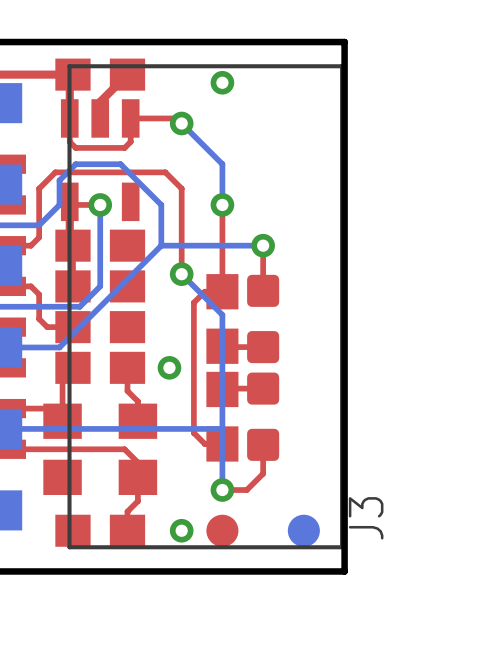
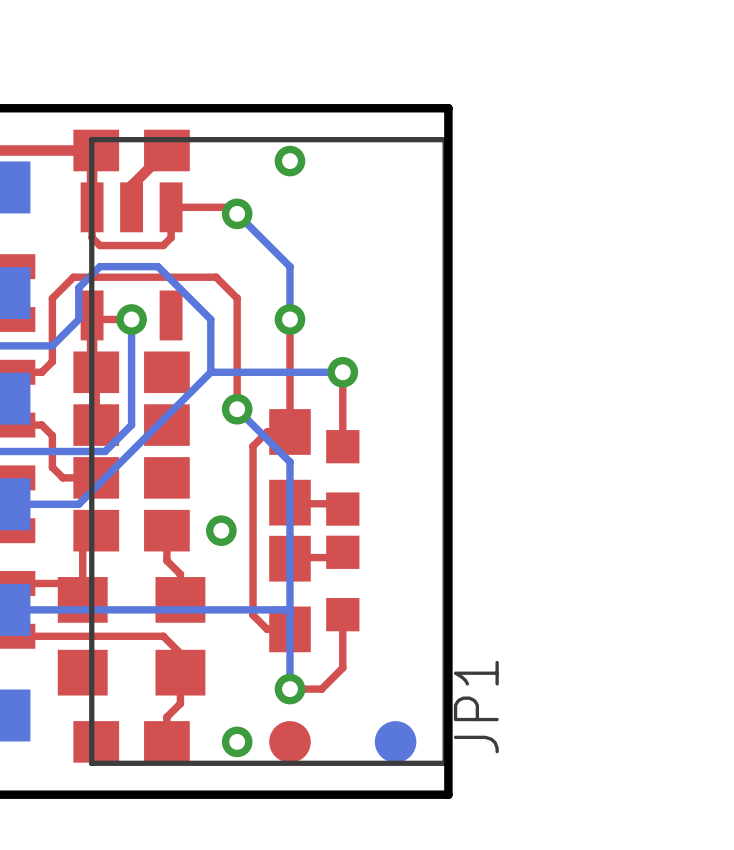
part footprint: [247, 274, 280, 364] -> [326, 430, 360, 526]
part footprint: [247, 372, 280, 461] -> [326, 535, 360, 632]
J3 name: J3 (366, 518) -> JP1 (476, 707)

